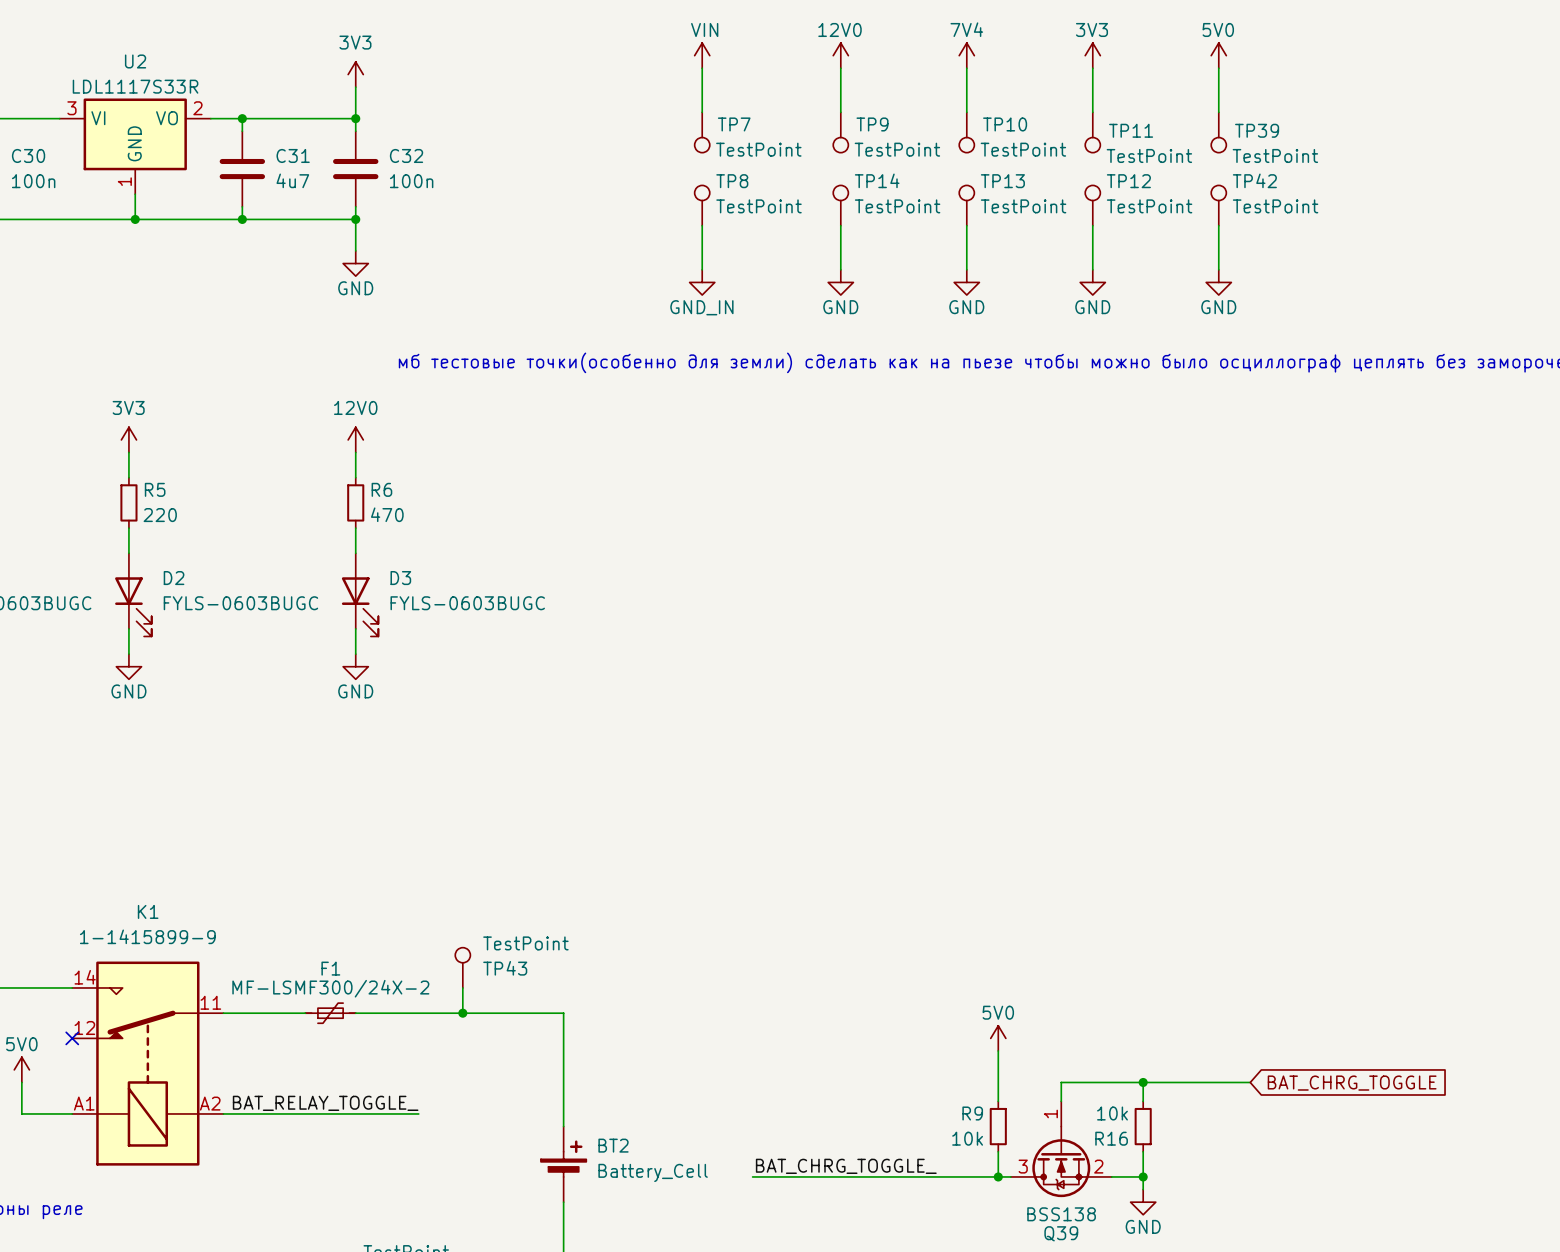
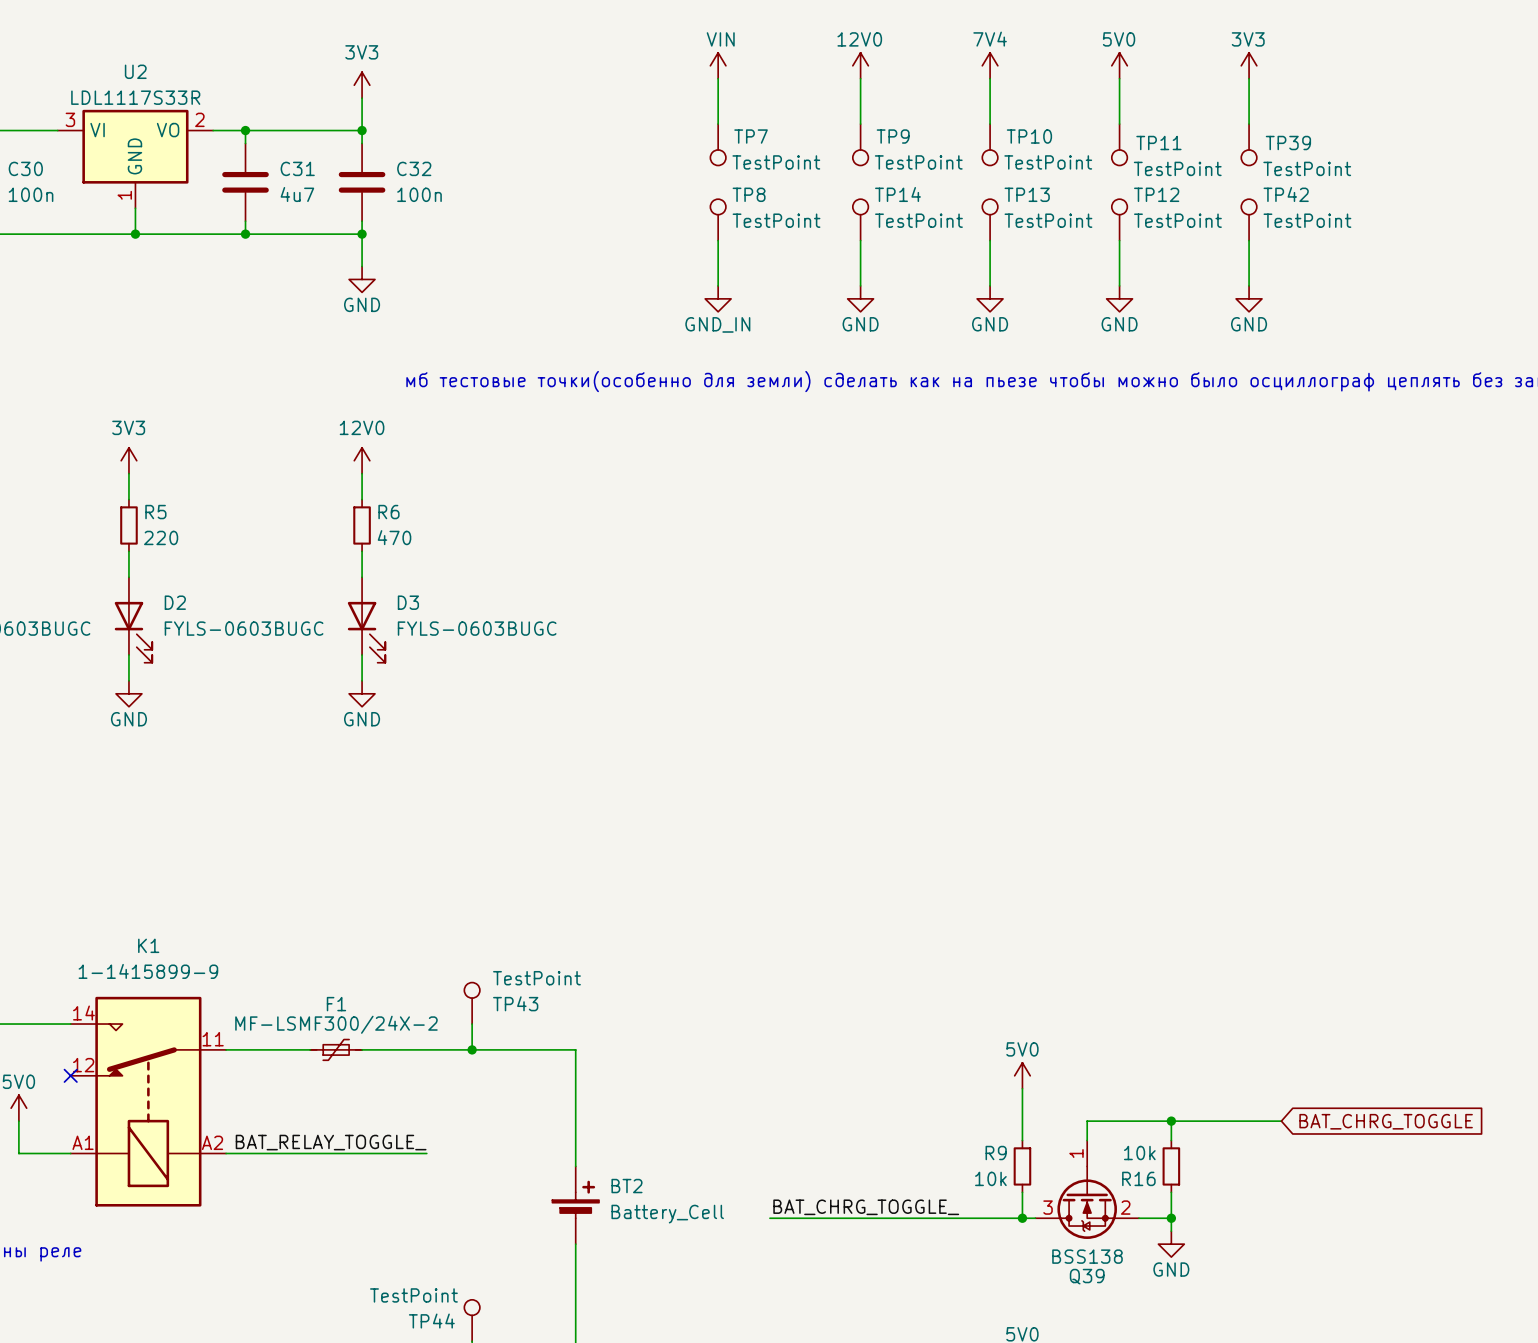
power symbol: 3V3 (1092, 55) -> 5V0 (1119, 65)
power symbol: 5V0 (1218, 55) -> 3V3 (1249, 65)

